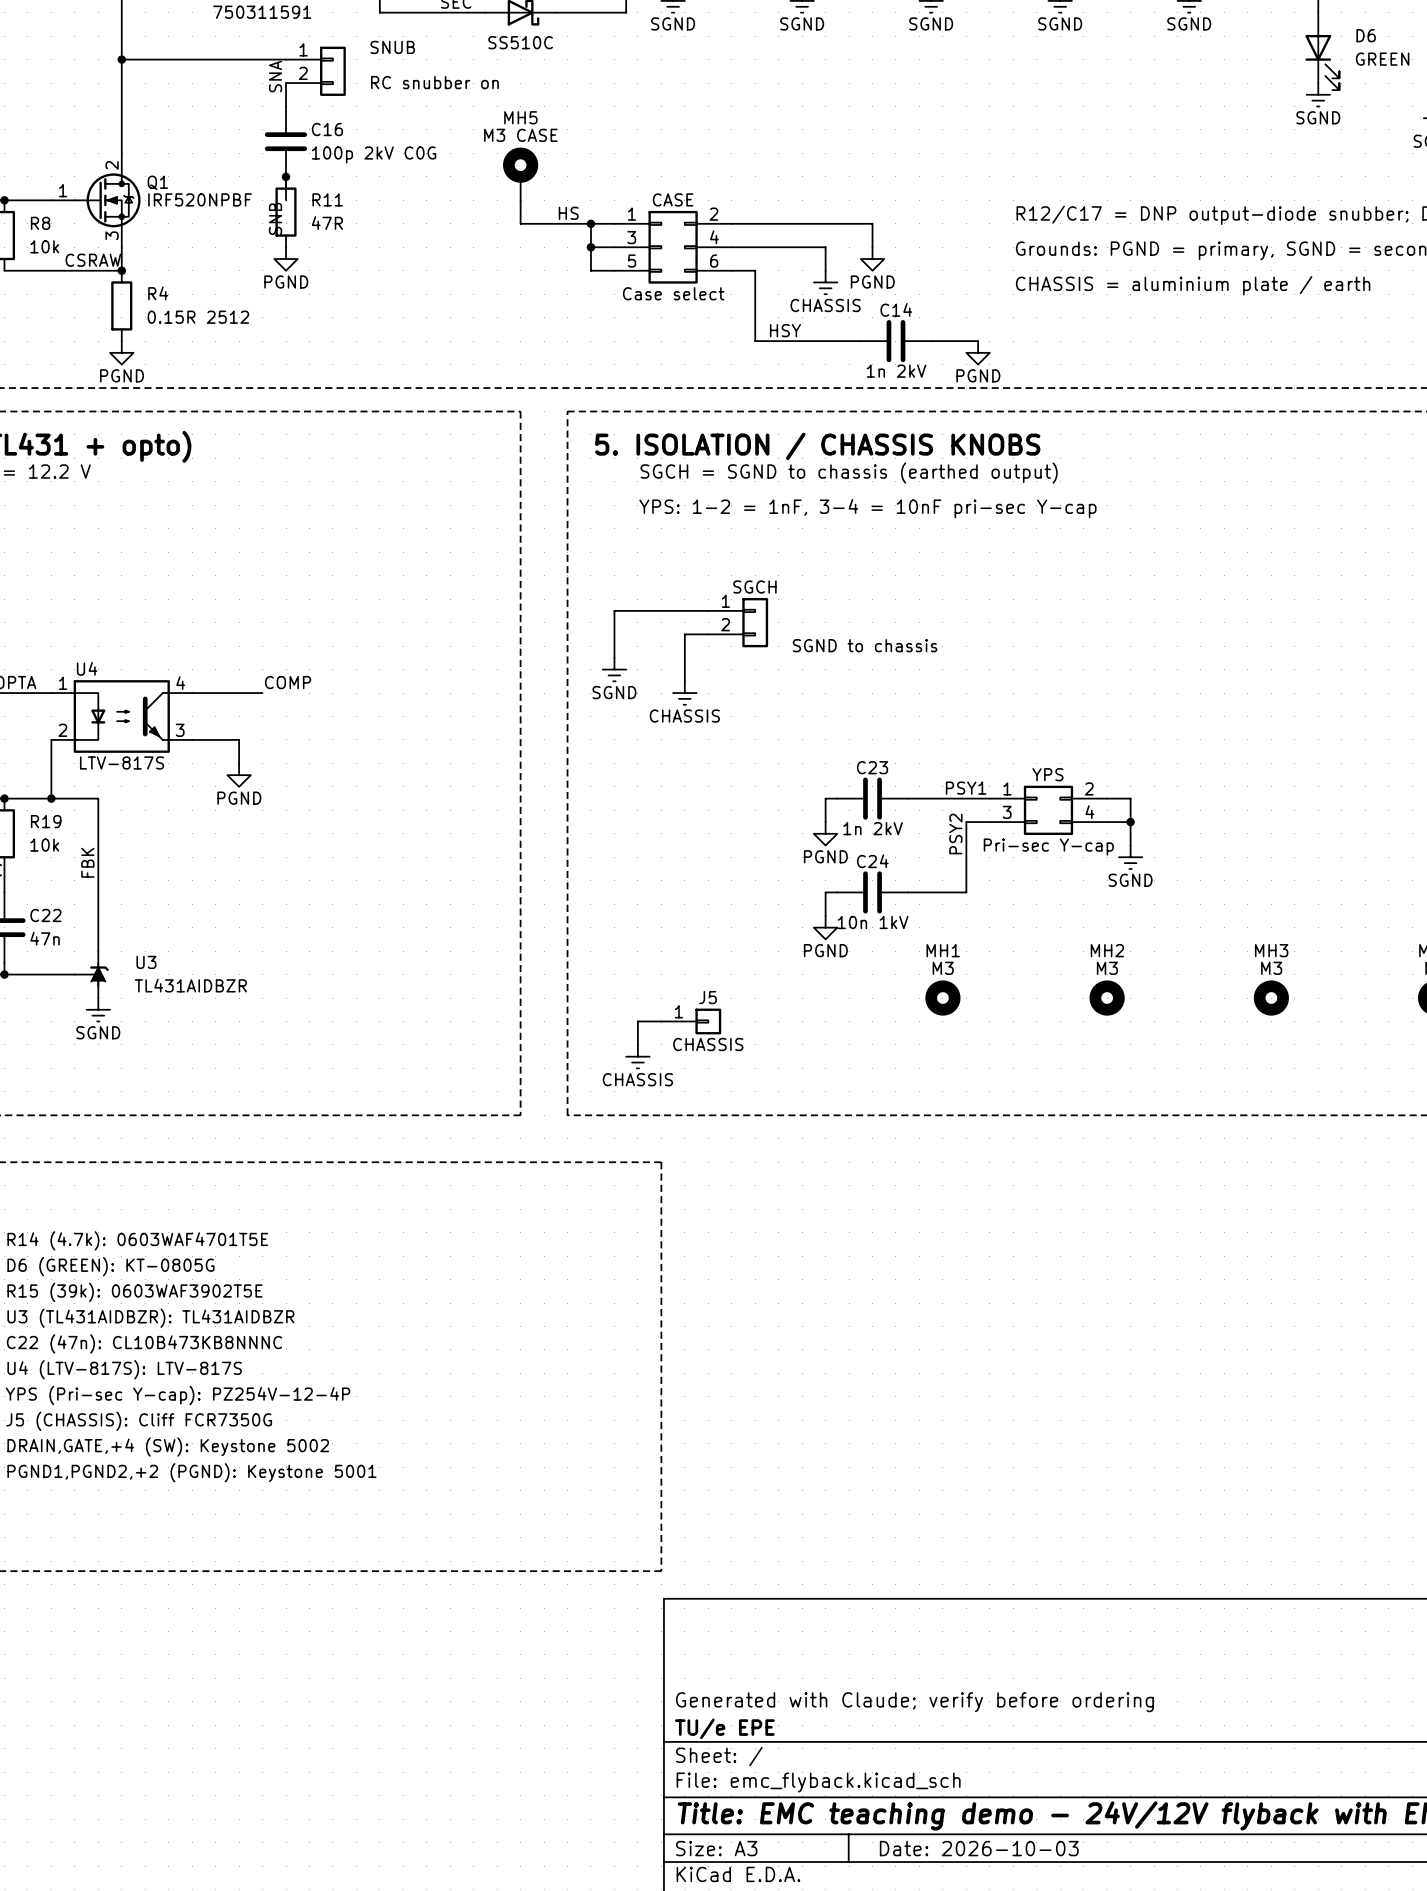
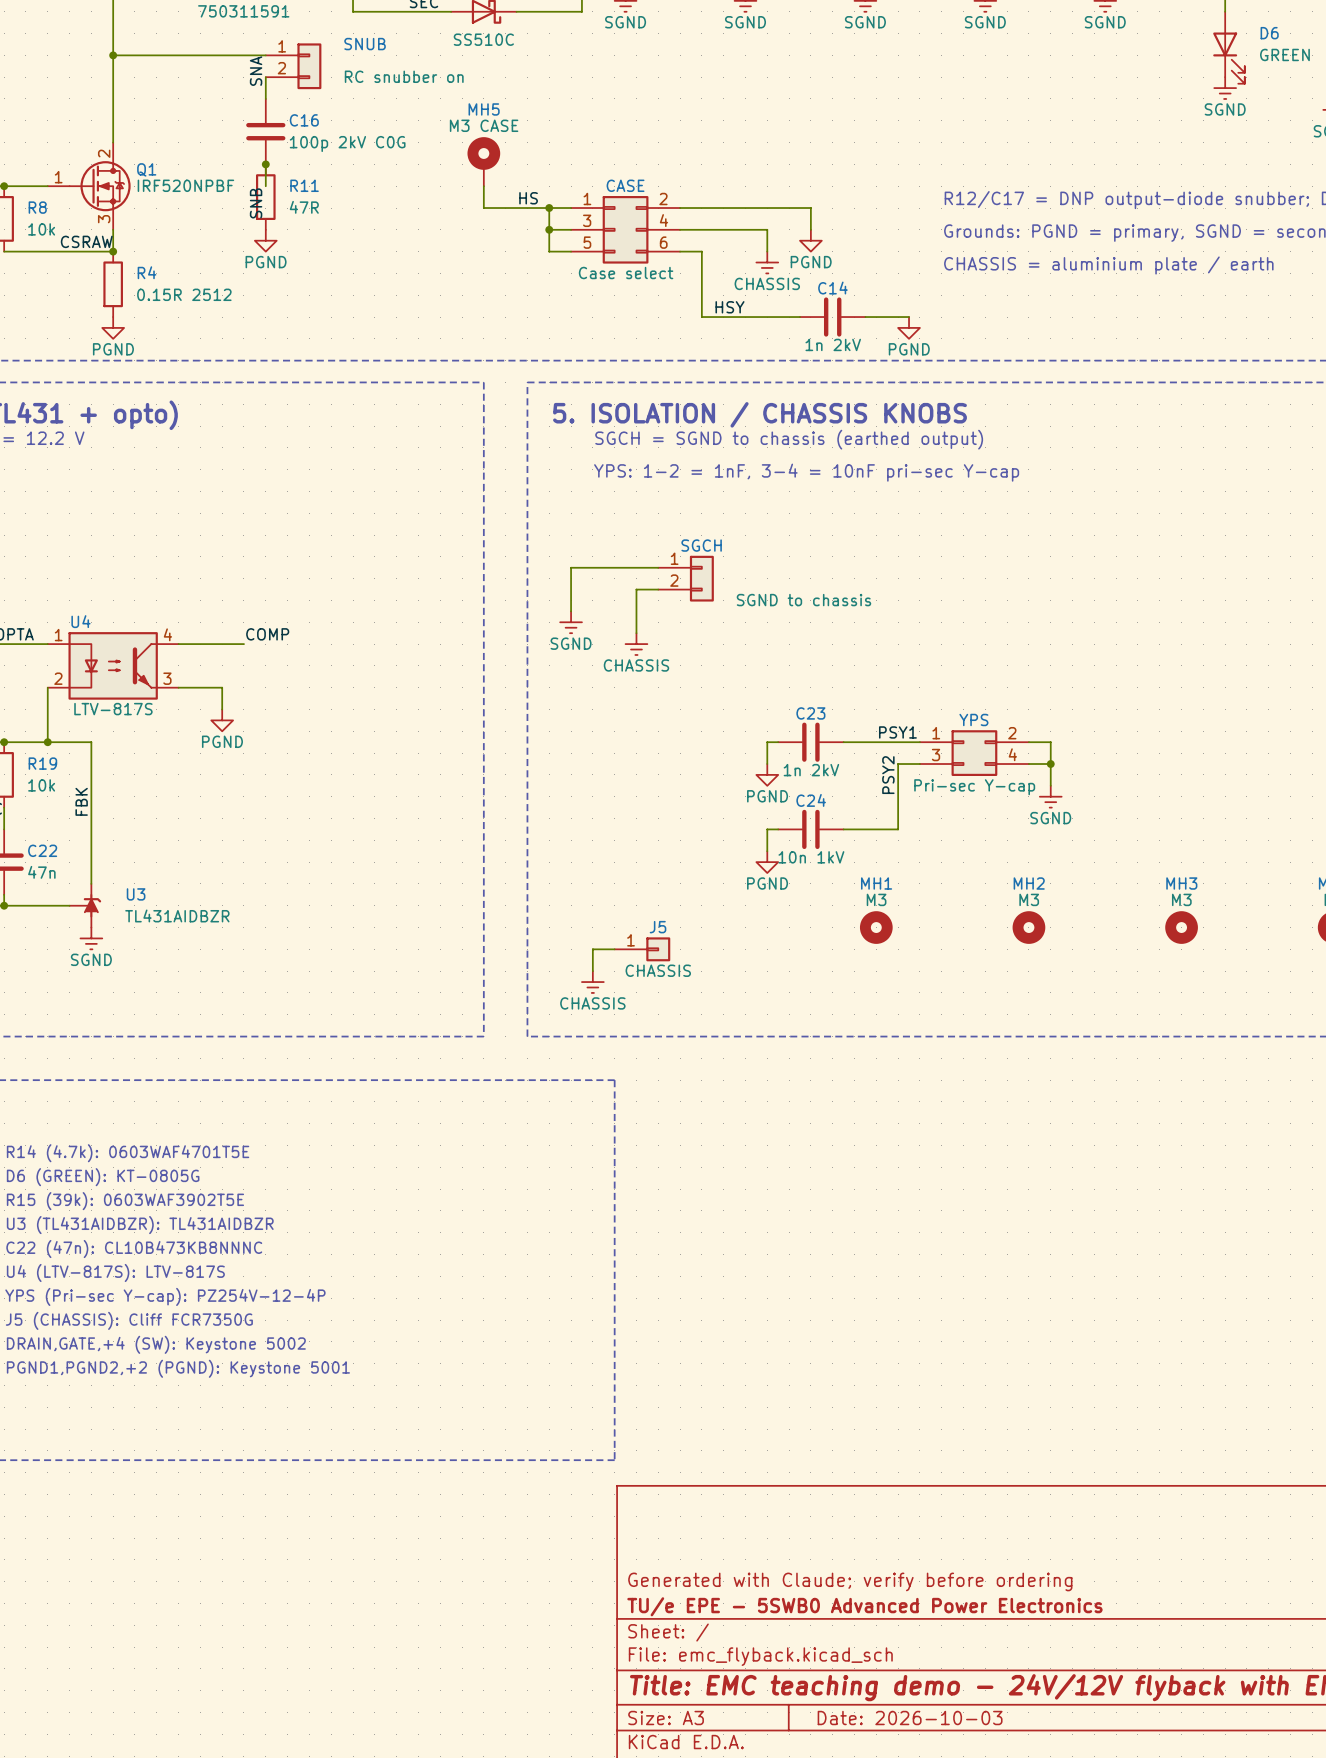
title block: TU/e EPE (724, 1728) -> TU/e EPE - 5SWB0 Advanced Power Electronics (864, 1606)

